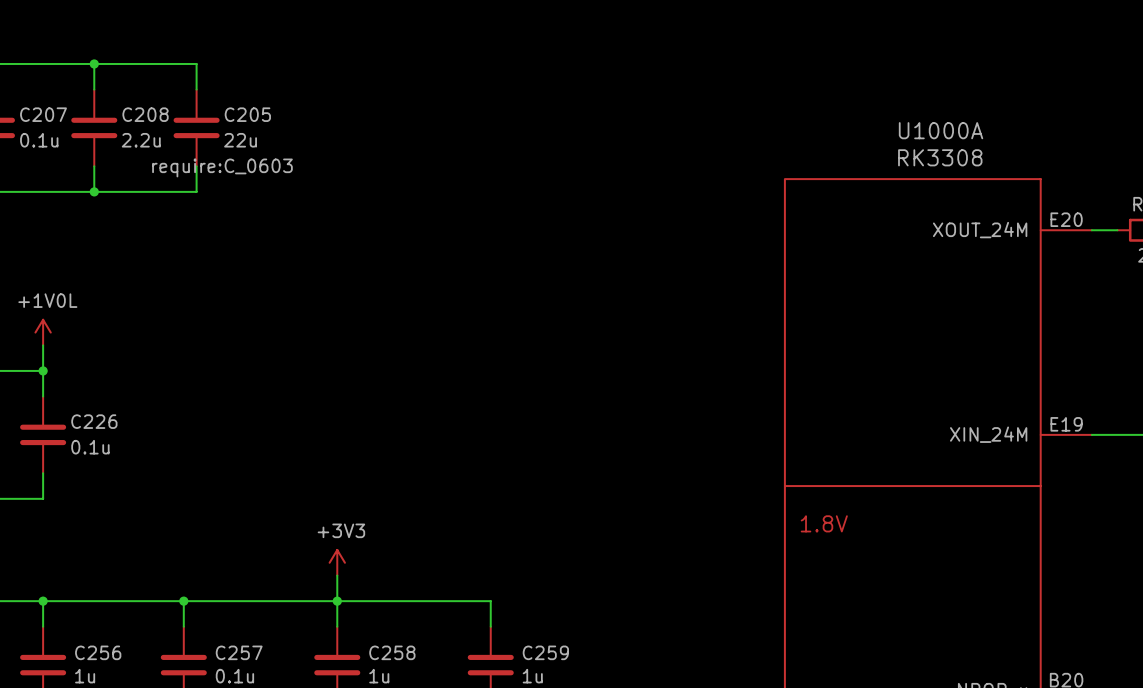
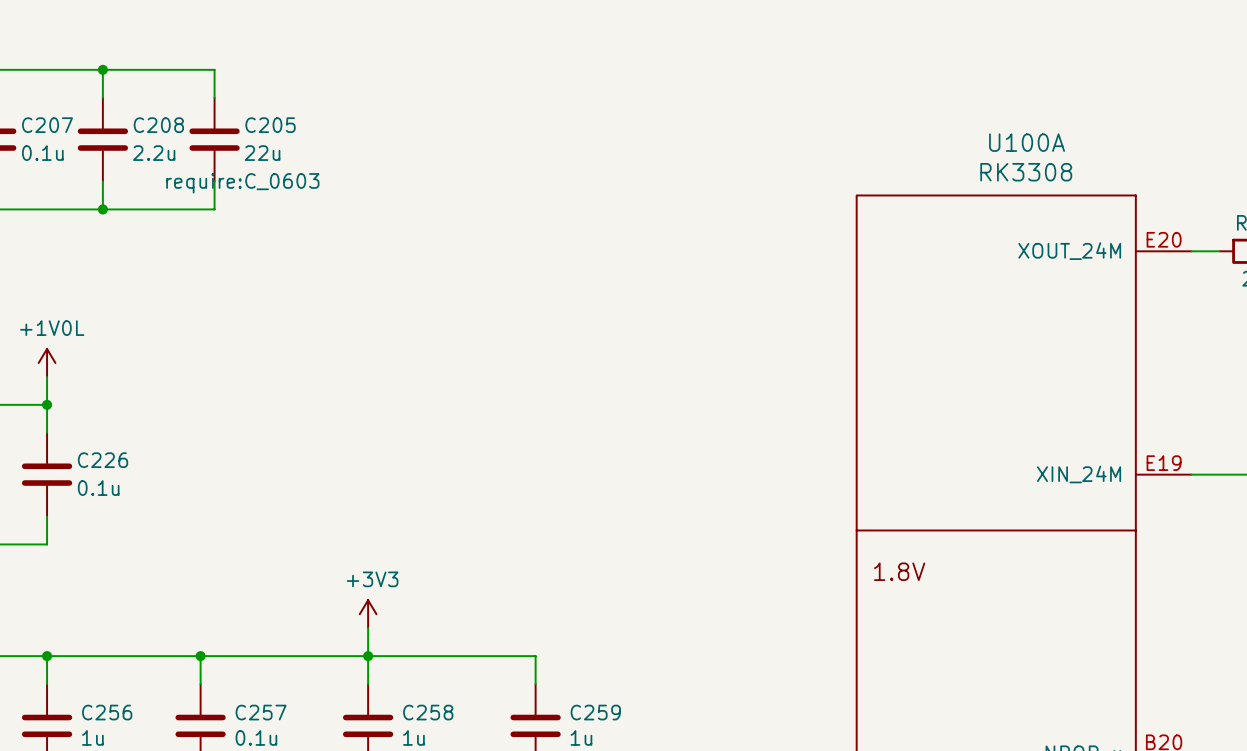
U1000A name: U1000A (941, 130) -> U100A (1027, 142)

